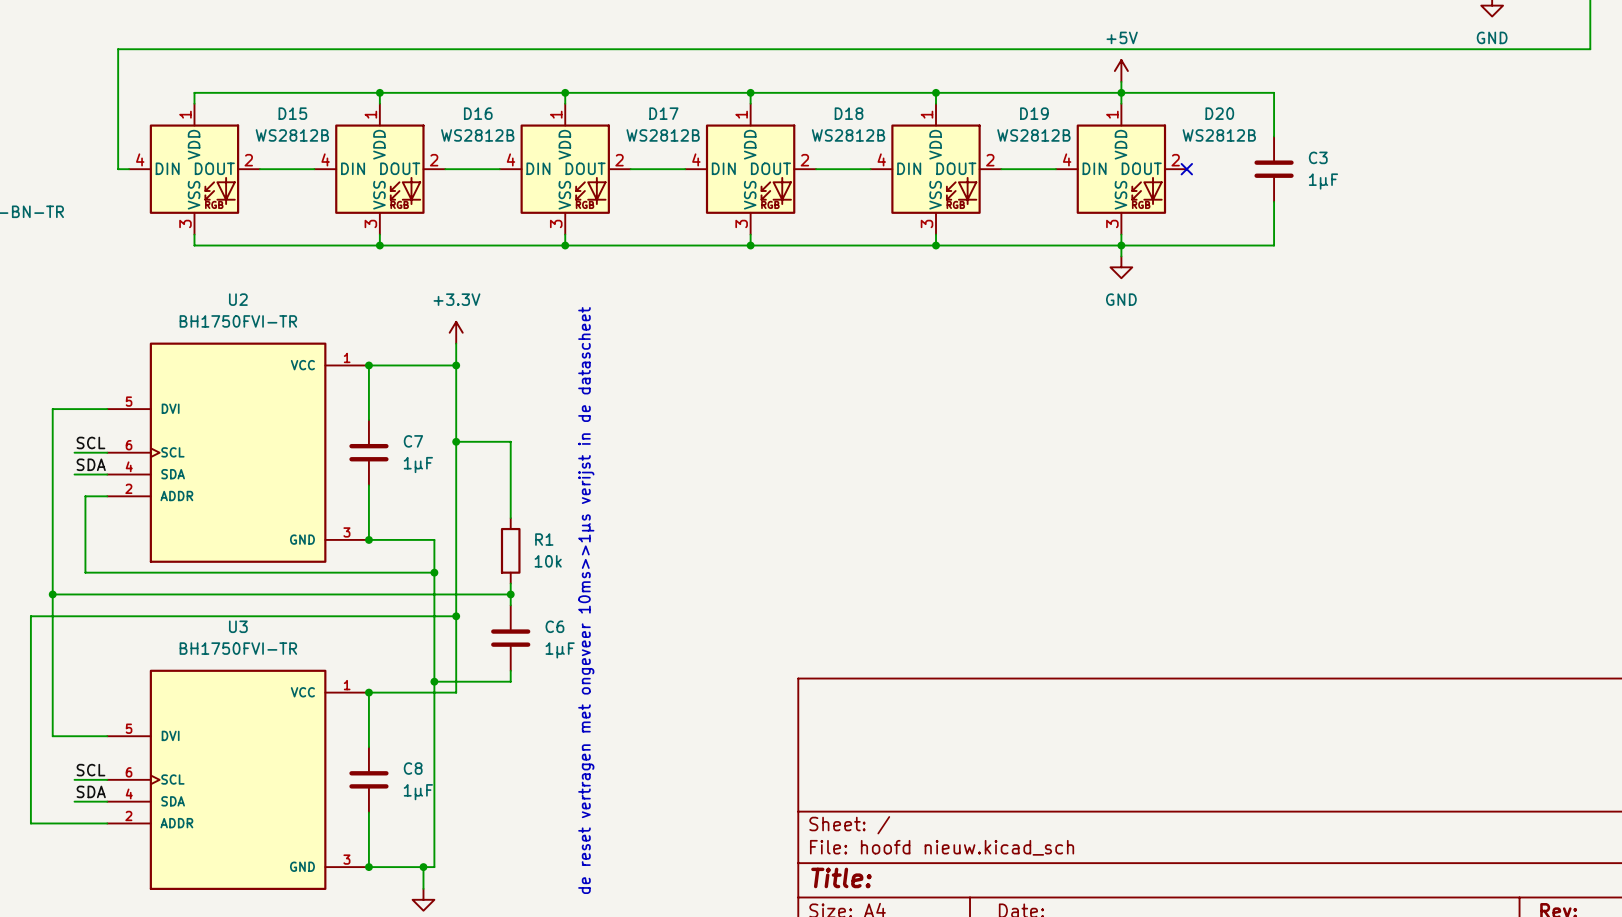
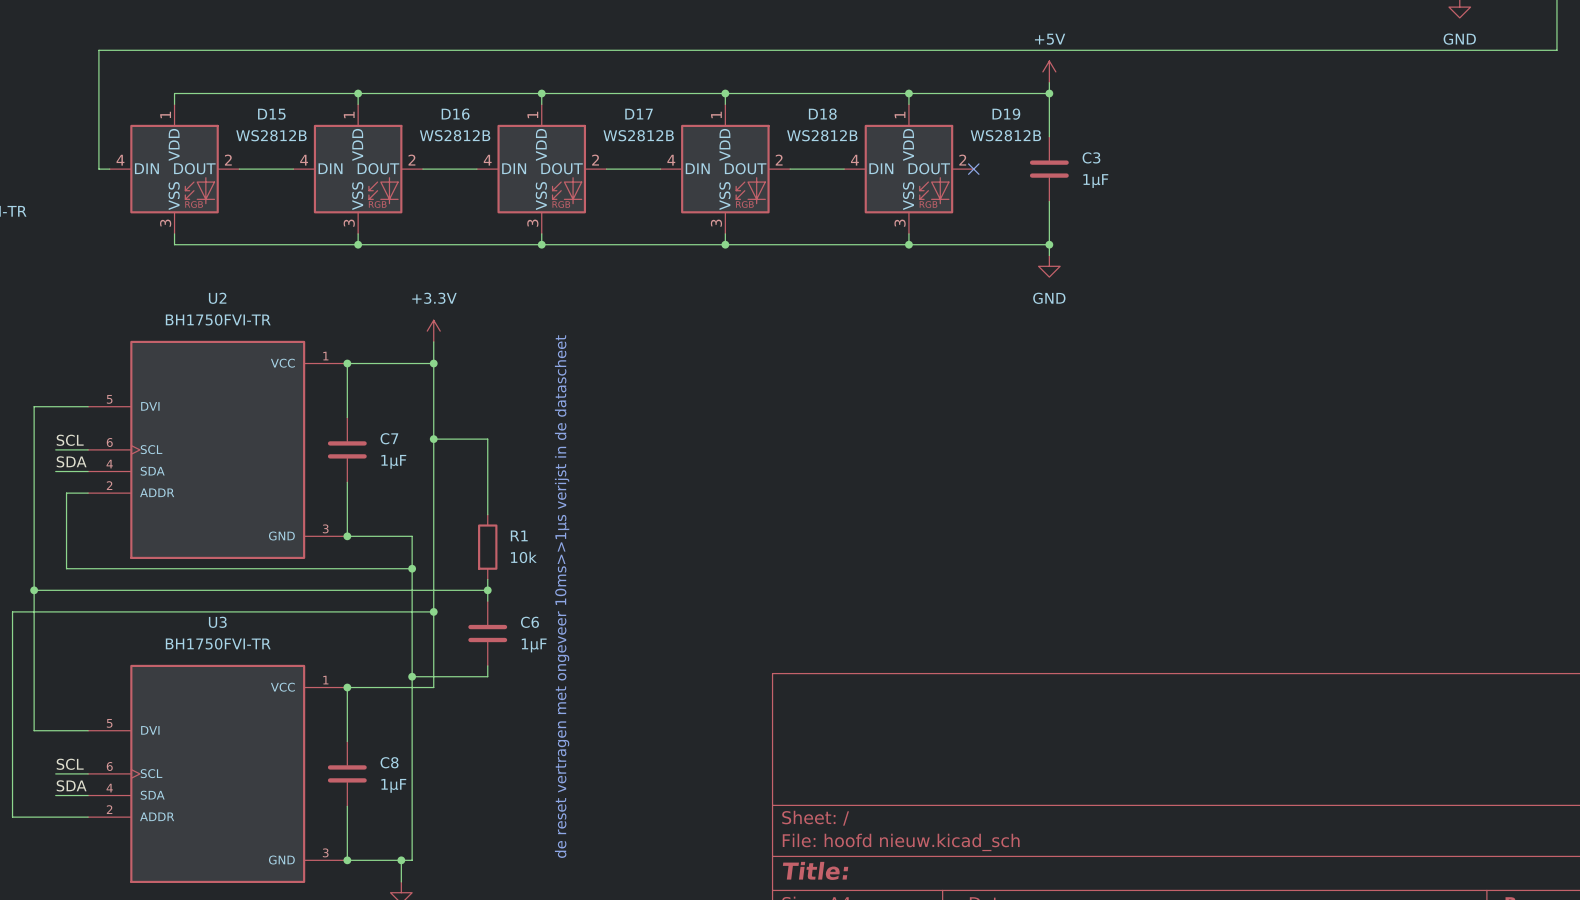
power symbol position: +5V (1121, 71) -> +5V (1049, 71)
wire: none -> (1049, 82) (1049, 136)
wire: (1121, 81) (1121, 103) -> none
wire: (1077, 92) (1274, 92) (1274, 136) -> none
junction position: (1121, 92) -> (1049, 93)
wire: (1001, 169) (1055, 169) -> none
no-connect mark: none -> (973, 169)
D20: WS2812B (1121, 169) -> none
no-connect mark: (1186, 169) -> none
C3 position: (1274, 169) -> (1049, 169)
wire: none -> (1049, 201) (1049, 255)
wire: (1274, 201) (1274, 245) (1077, 245) -> none
wire: (1121, 234) (1121, 256) -> none
junction position: (1121, 245) -> (1049, 244)
power symbol position: GND (1121, 267) -> GND (1049, 266)

